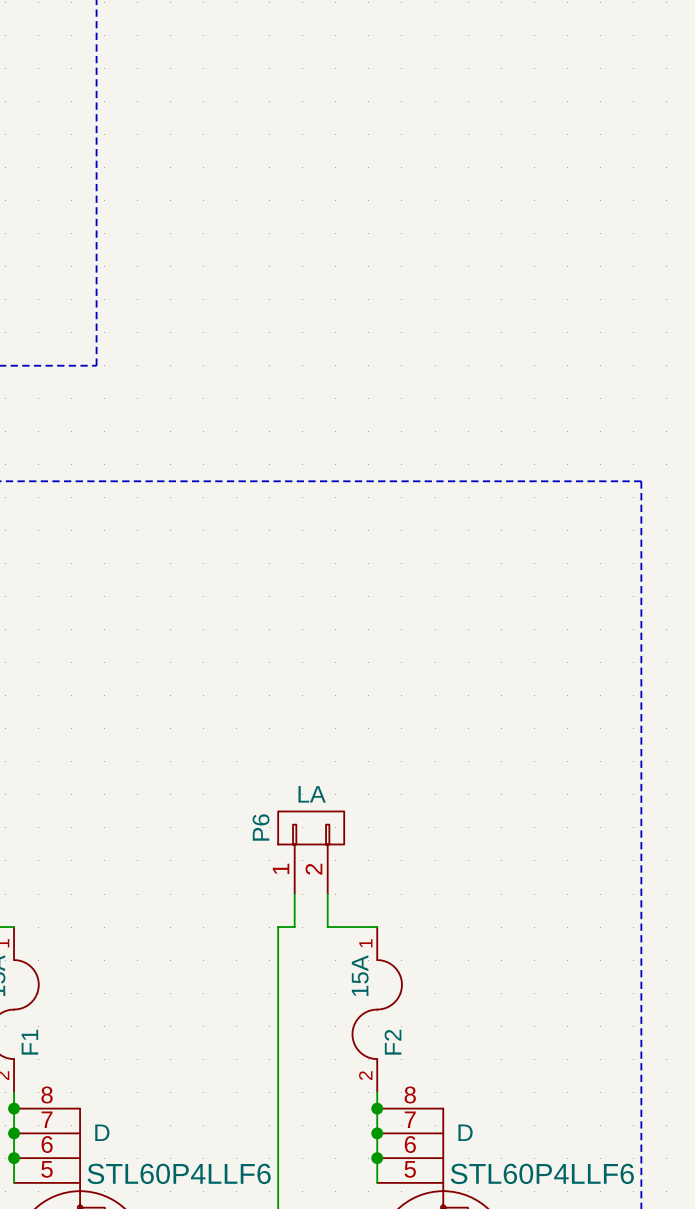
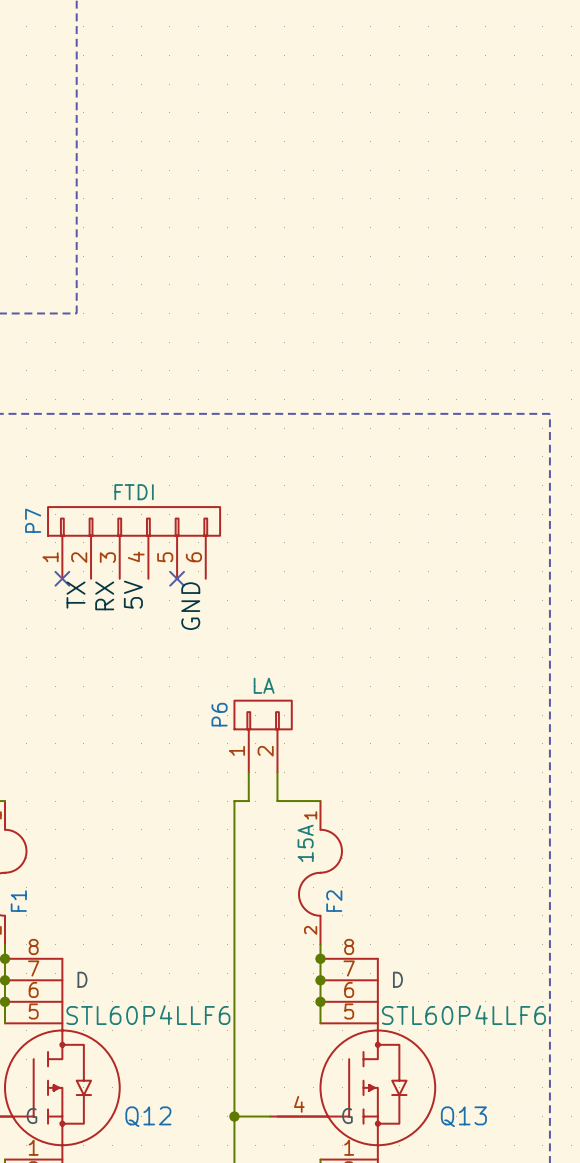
P7: none -> FTDI (134, 542)
no-connect mark: none -> (62, 578)
no-connect mark: none -> (177, 578)
label: none -> 5V (133, 594)
label: none -> TX (76, 595)
label: none -> RX (104, 595)
label: none -> GND (190, 606)

